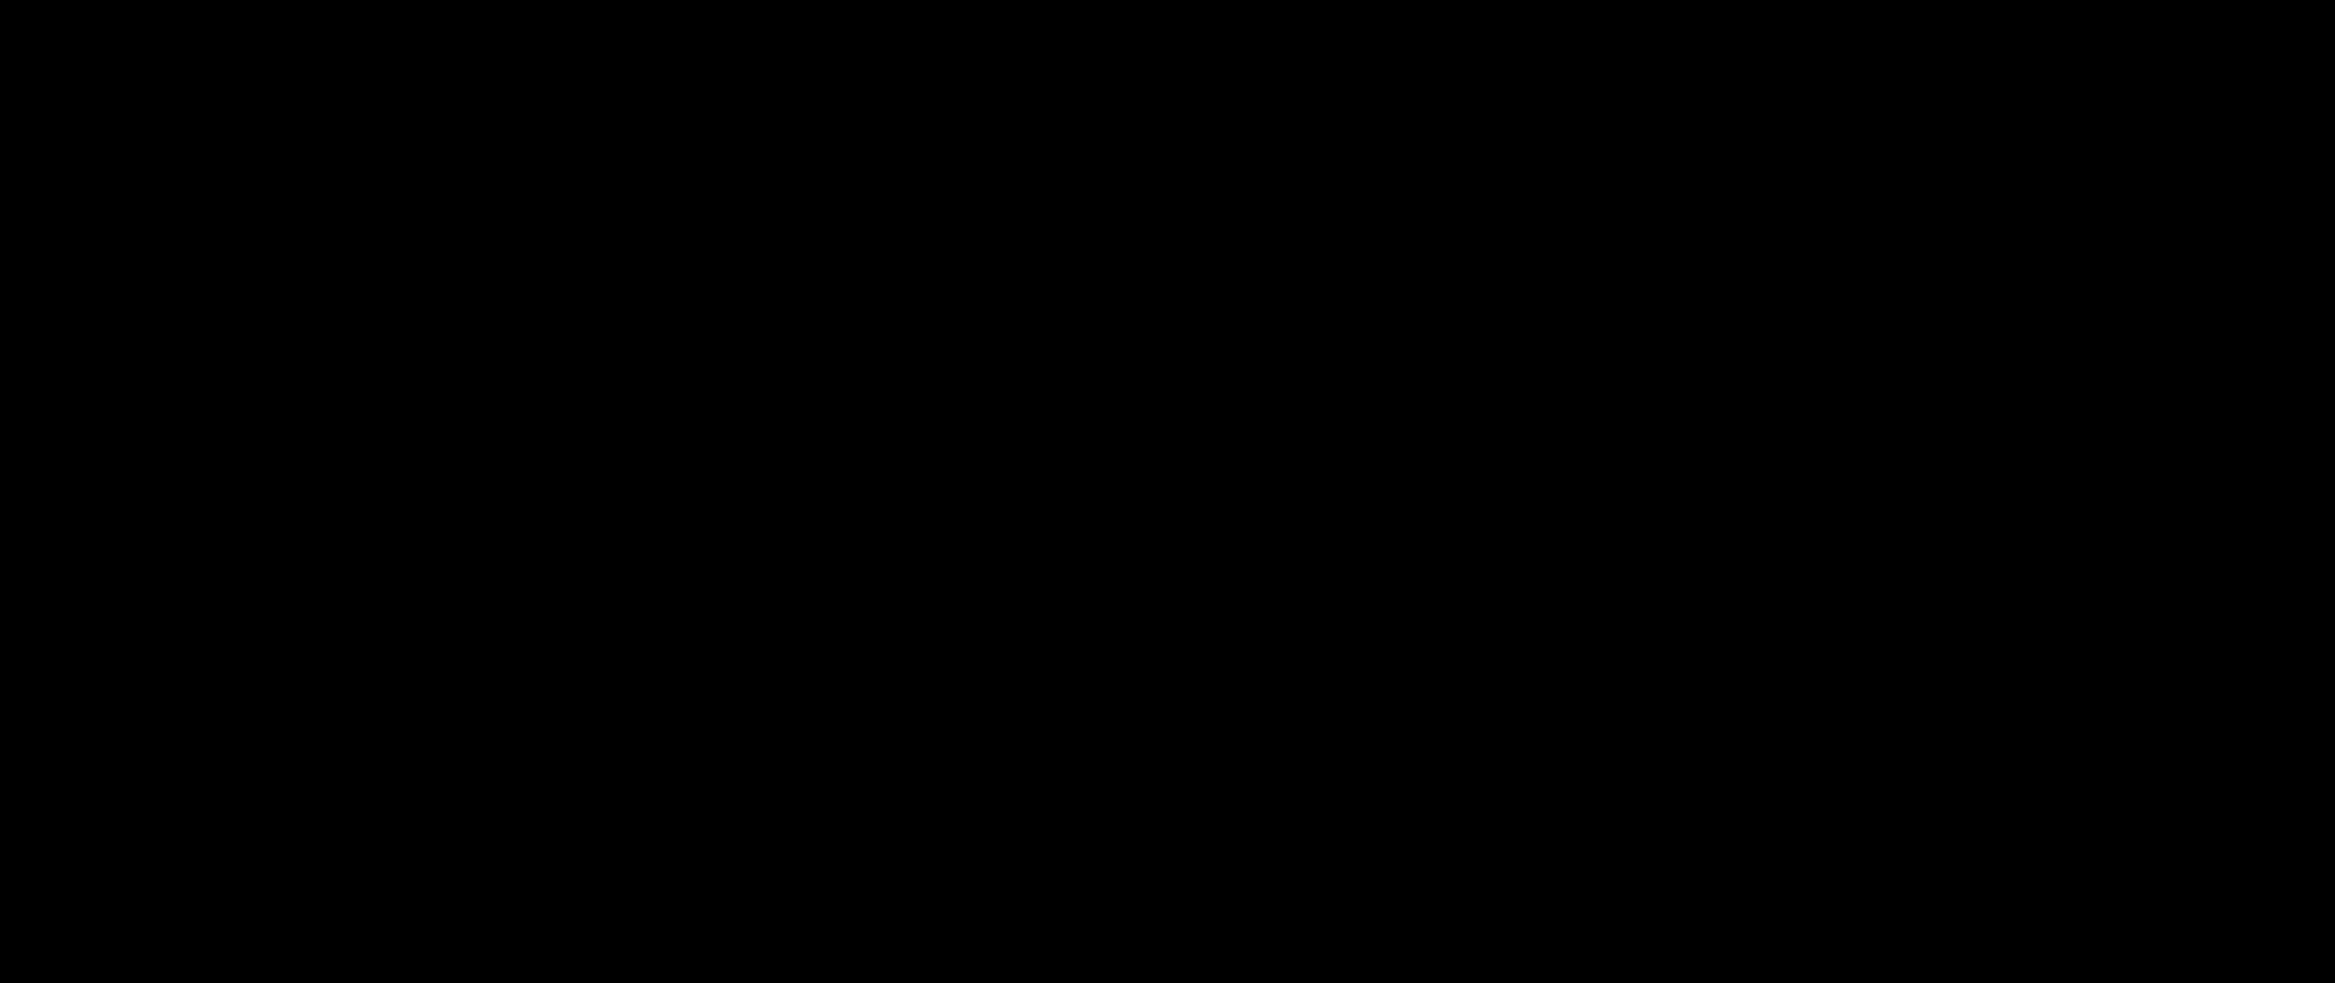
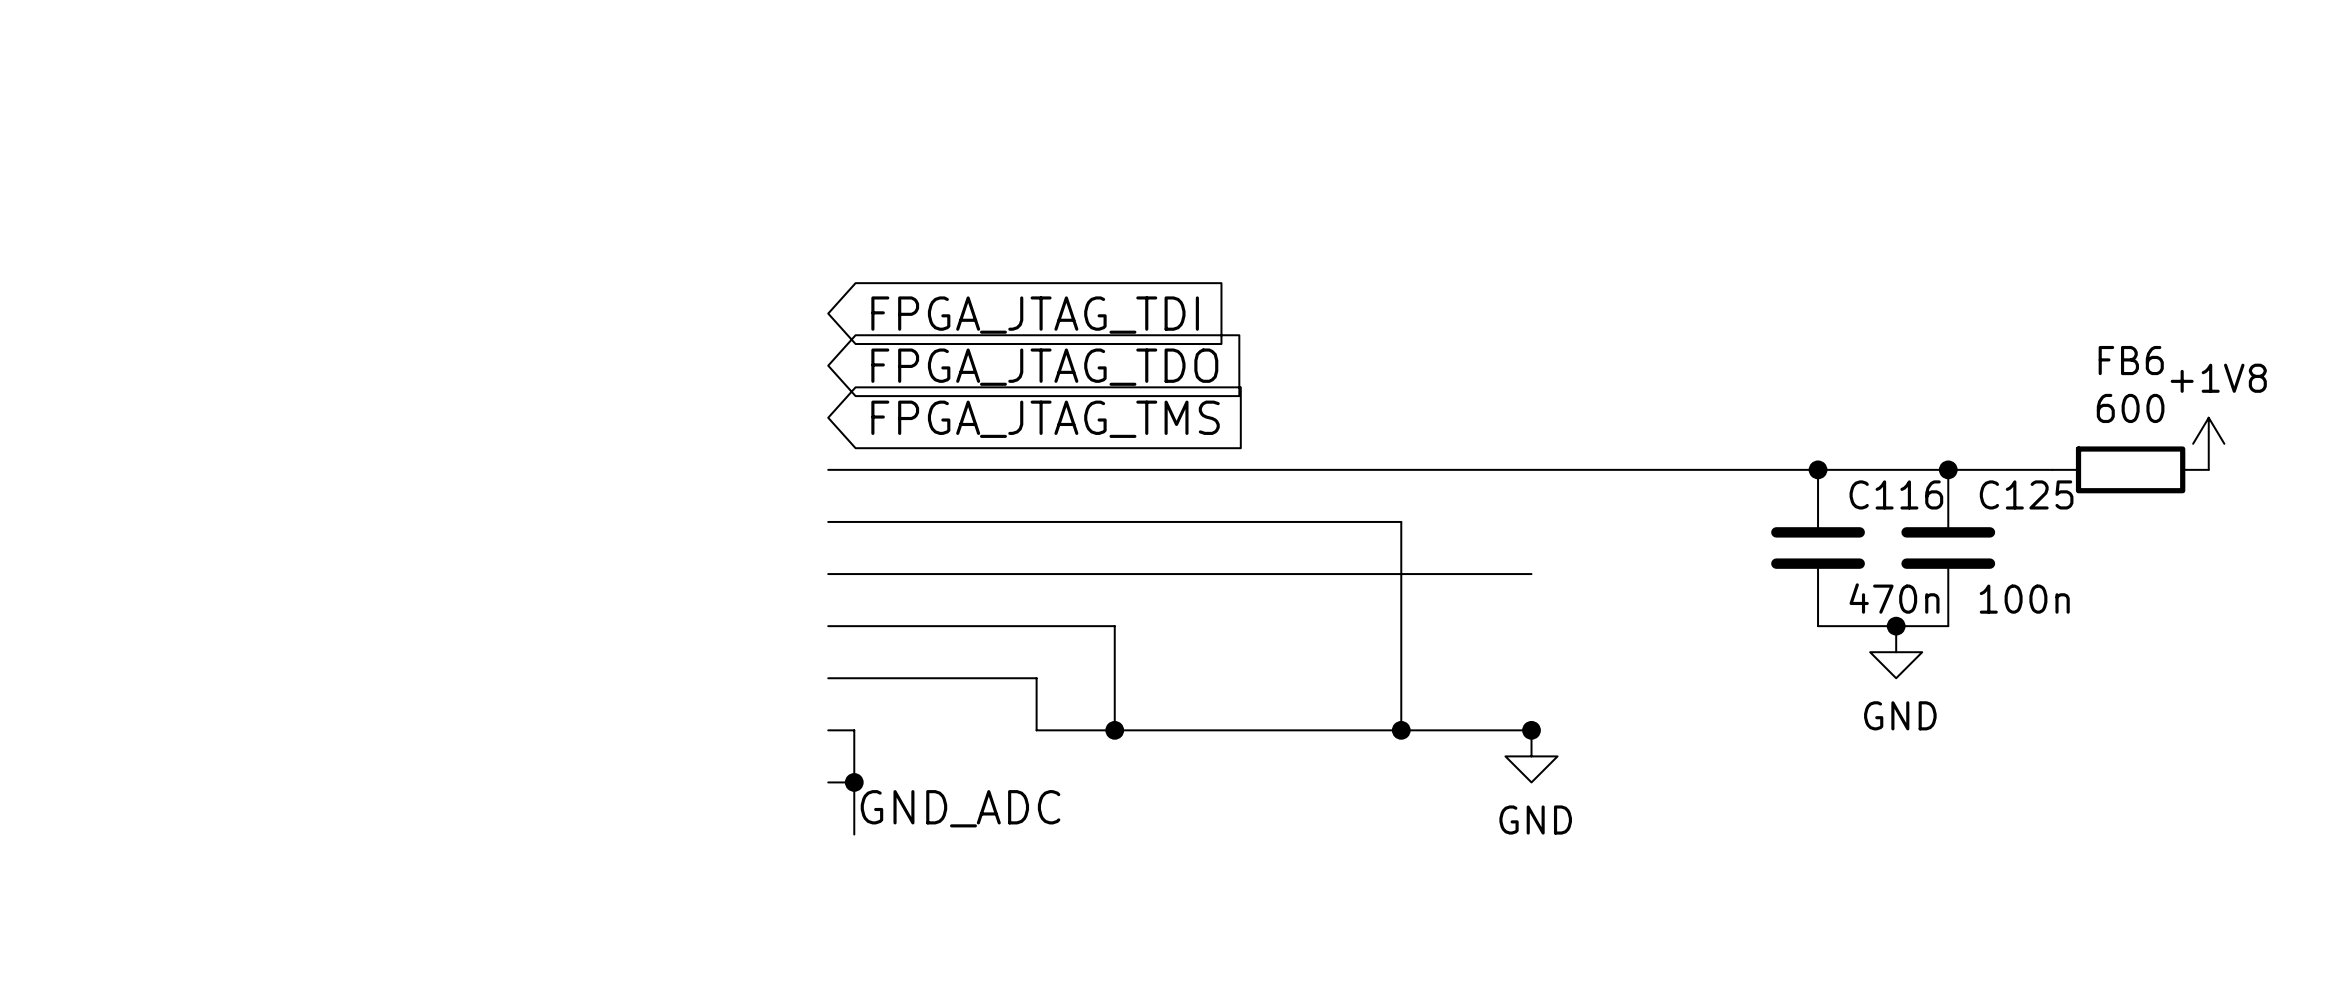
global label: none -> FPGA_JTAG_TDI (1035, 315)
global label: none -> FPGA_JTAG_TDO (1044, 367)
global label: none -> FPGA_JTAG_TMS (1045, 419)
power symbol: none -> +1V8 (2208, 443)
wire: none -> (828, 469) (2052, 469)
junction: none -> (1818, 469)
junction: none -> (1948, 469)
FB6: none -> 600 (2130, 469)
wire: none -> (828, 521) (1401, 521) (1401, 730)
C116: none -> 470n (1818, 548)
C125: none -> 100n (1948, 548)
wire: none -> (828, 574) (1531, 574)
wire: none -> (828, 626) (1114, 626) (1114, 730)
wire: none -> (1818, 626) (1948, 626)
junction: none -> (1896, 626)
power symbol: none -> GND (1896, 652)
wire: none -> (828, 678) (1036, 678) (1036, 730) (1531, 730)
wire: none -> (828, 730) (854, 730) (854, 834)
junction: none -> (1114, 730)
junction: none -> (1401, 730)
junction: none -> (1531, 730)
power symbol: none -> GND (1531, 756)
wire: none -> (828, 782) (854, 782)
junction: none -> (854, 782)
label: none -> GND_ADC (960, 808)

